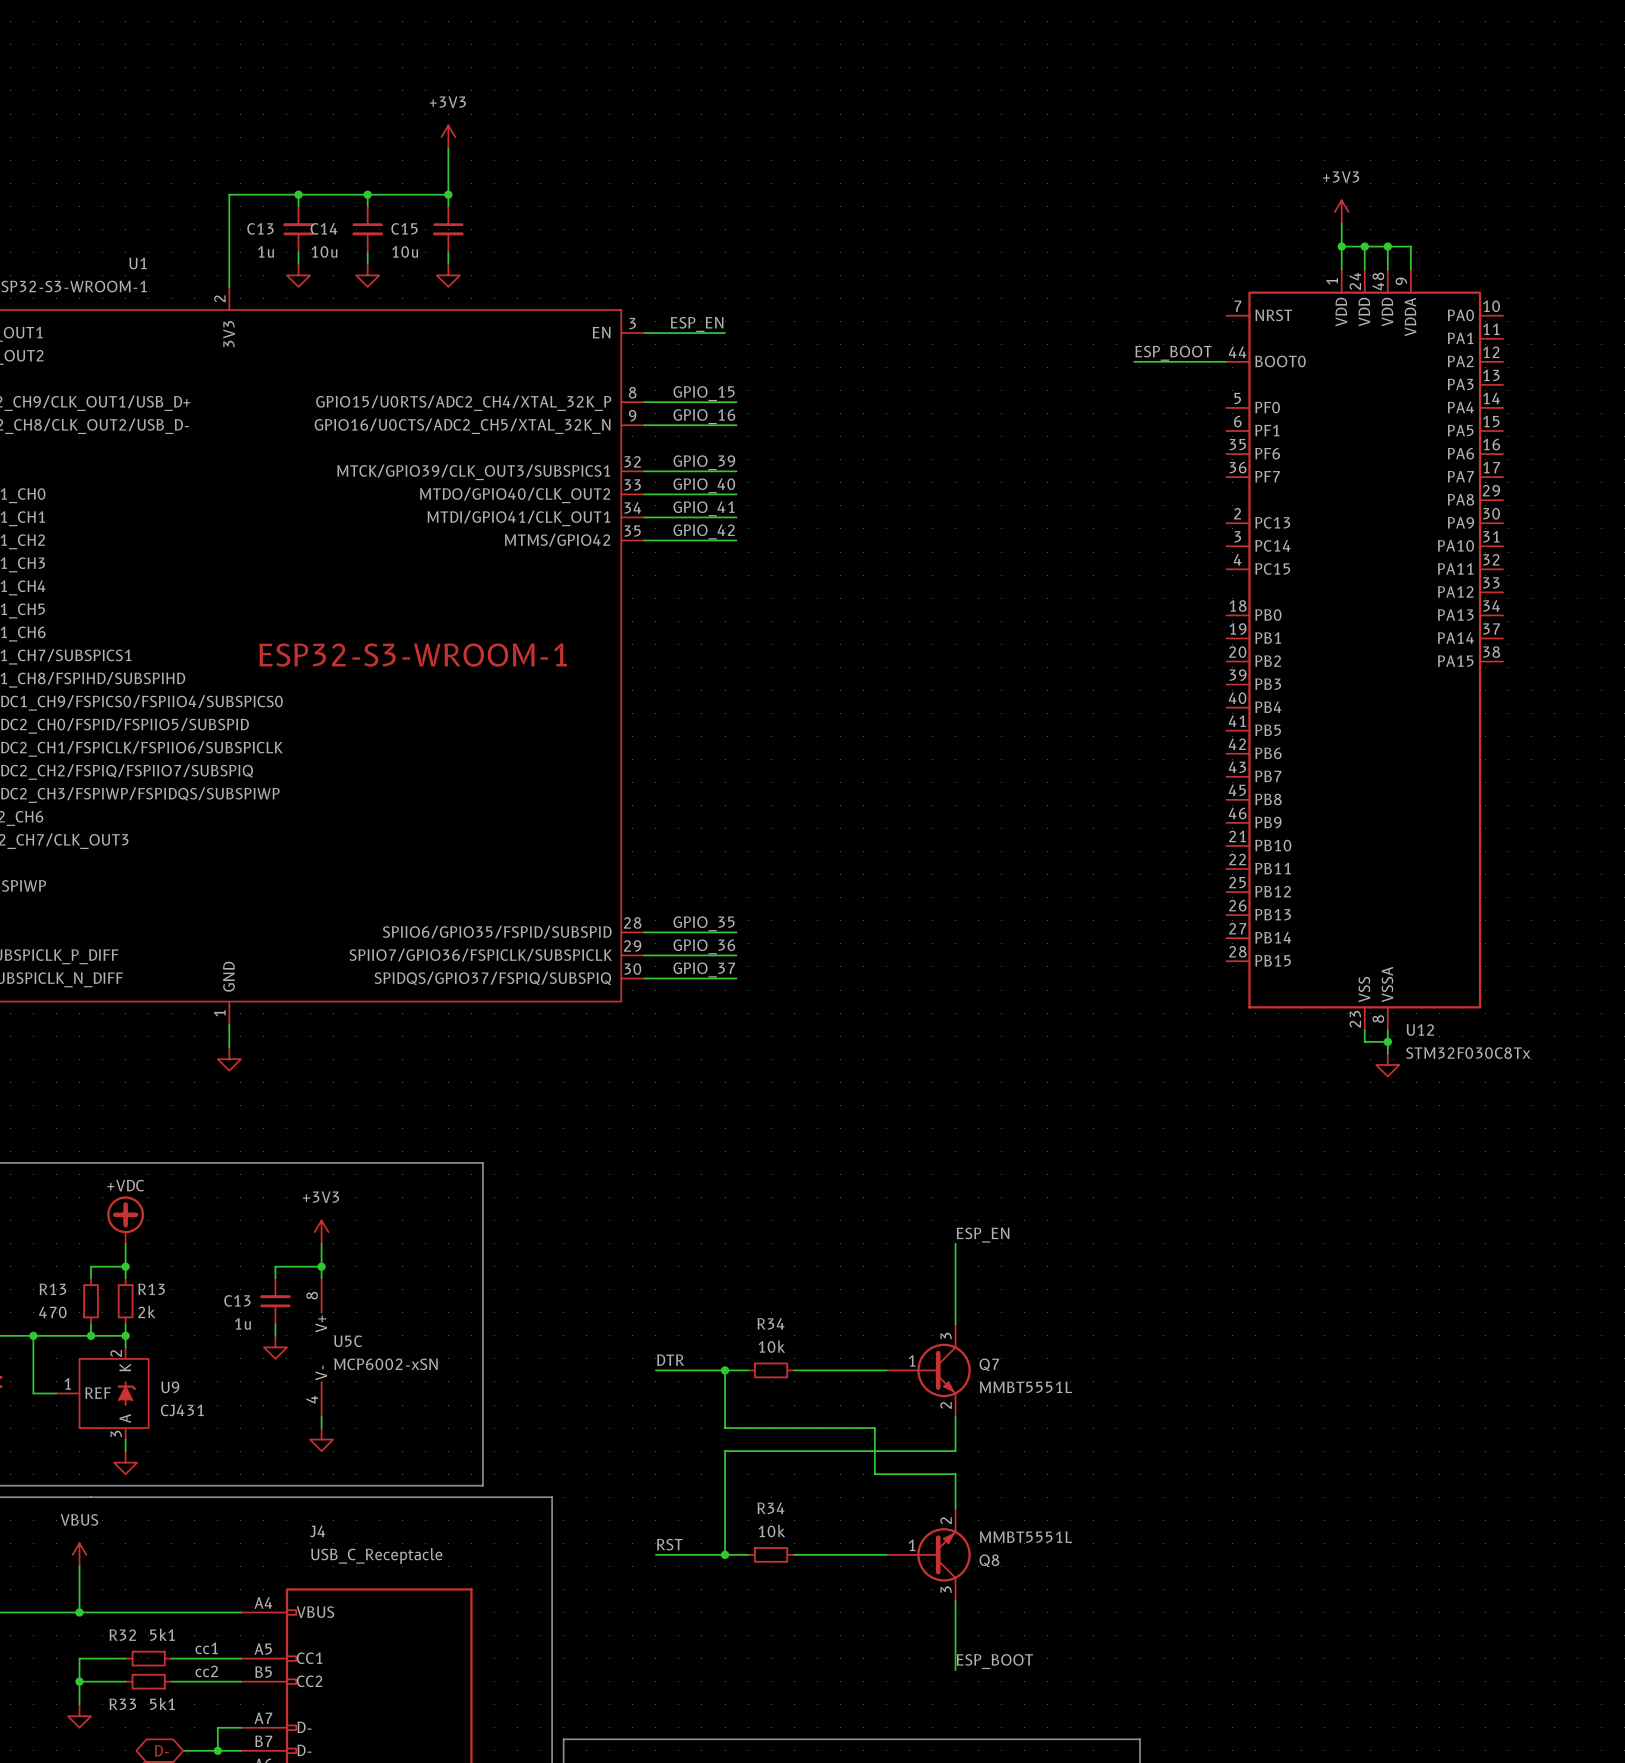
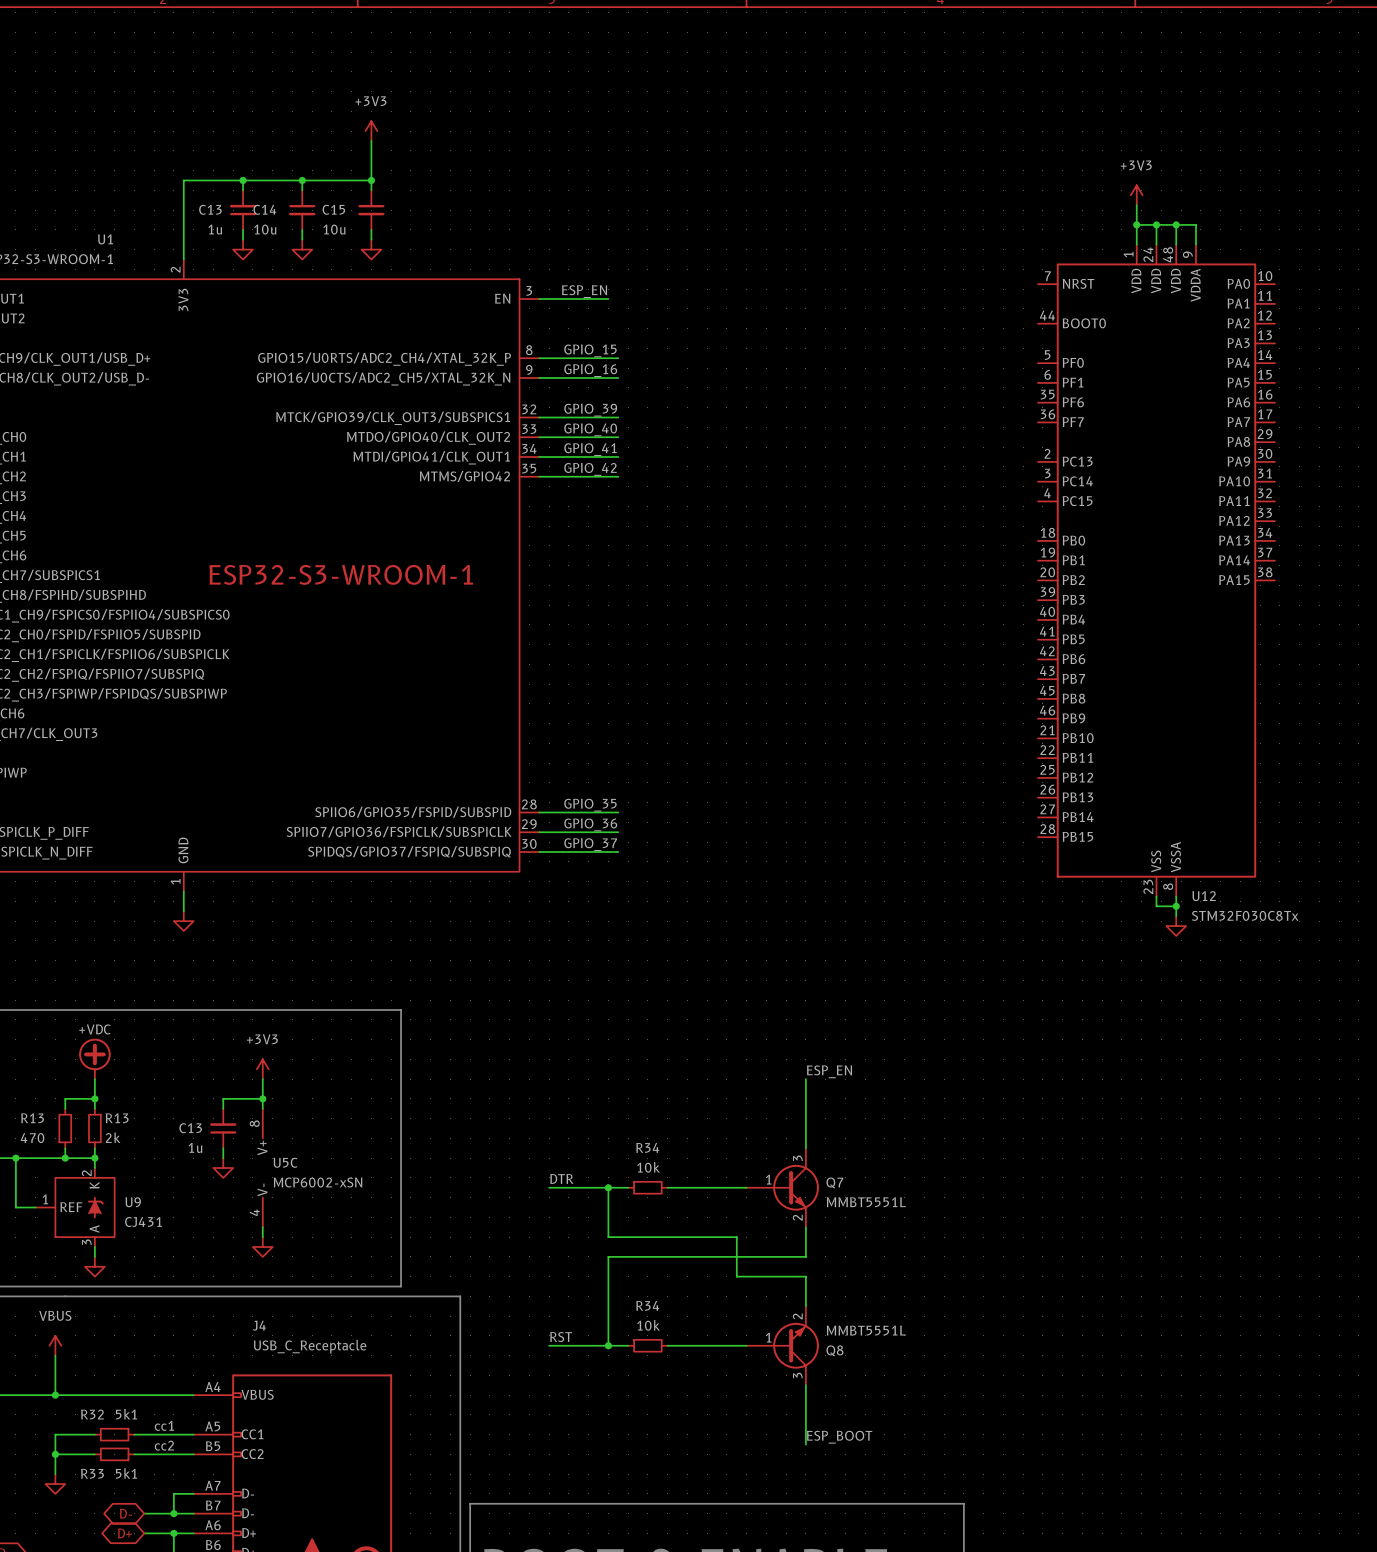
label: ESP_BOOT (1173, 353) -> none
wire: (1134, 361) (1226, 361) -> none

